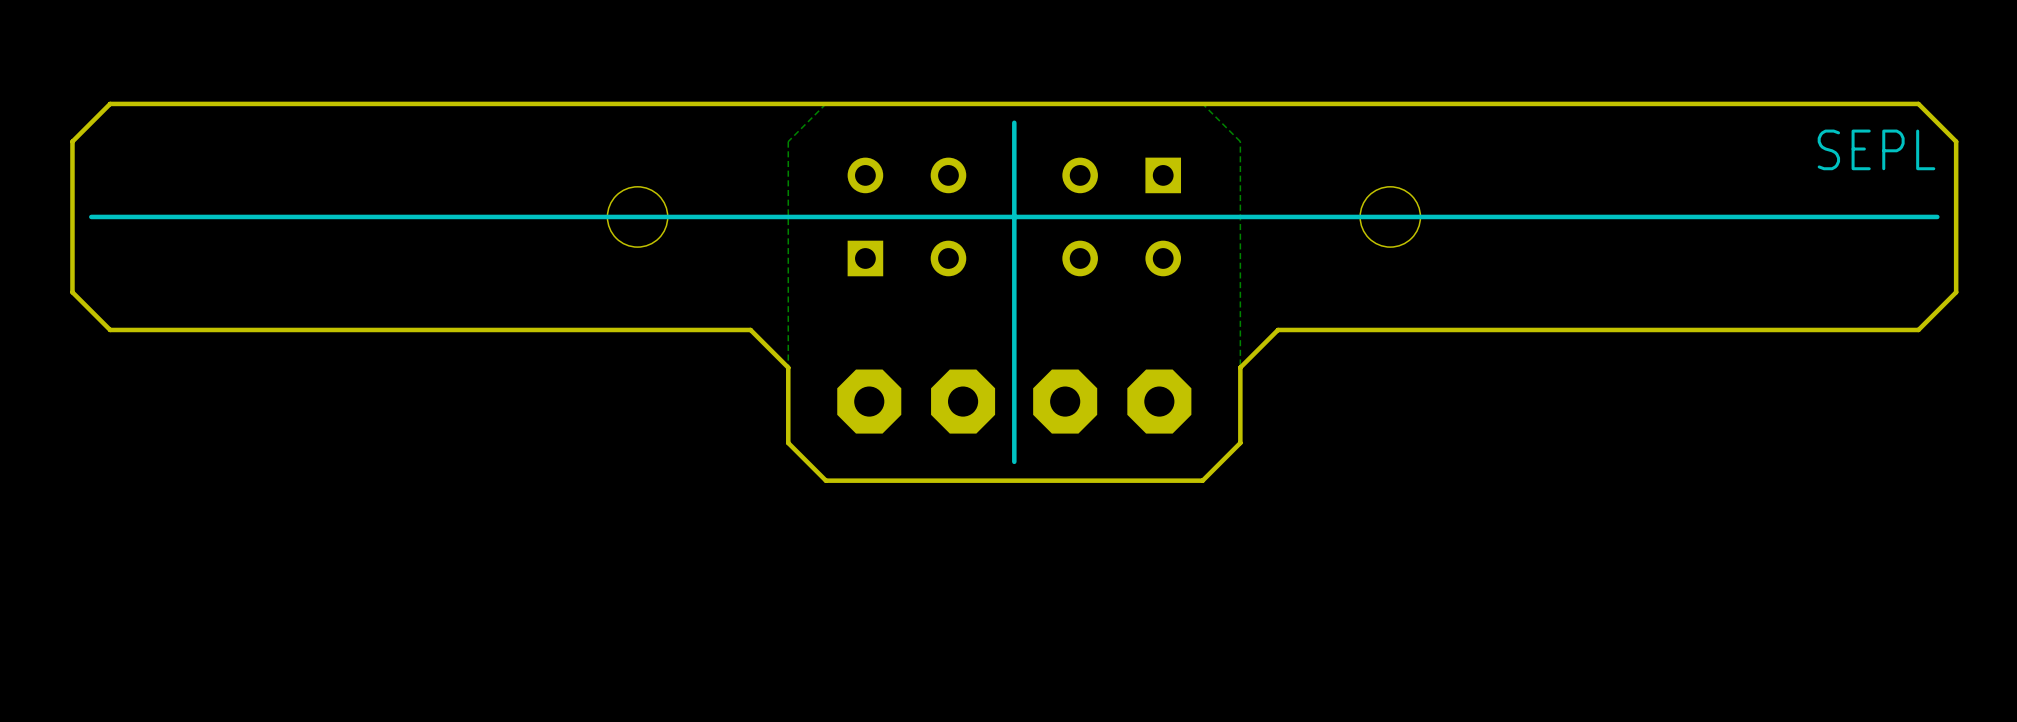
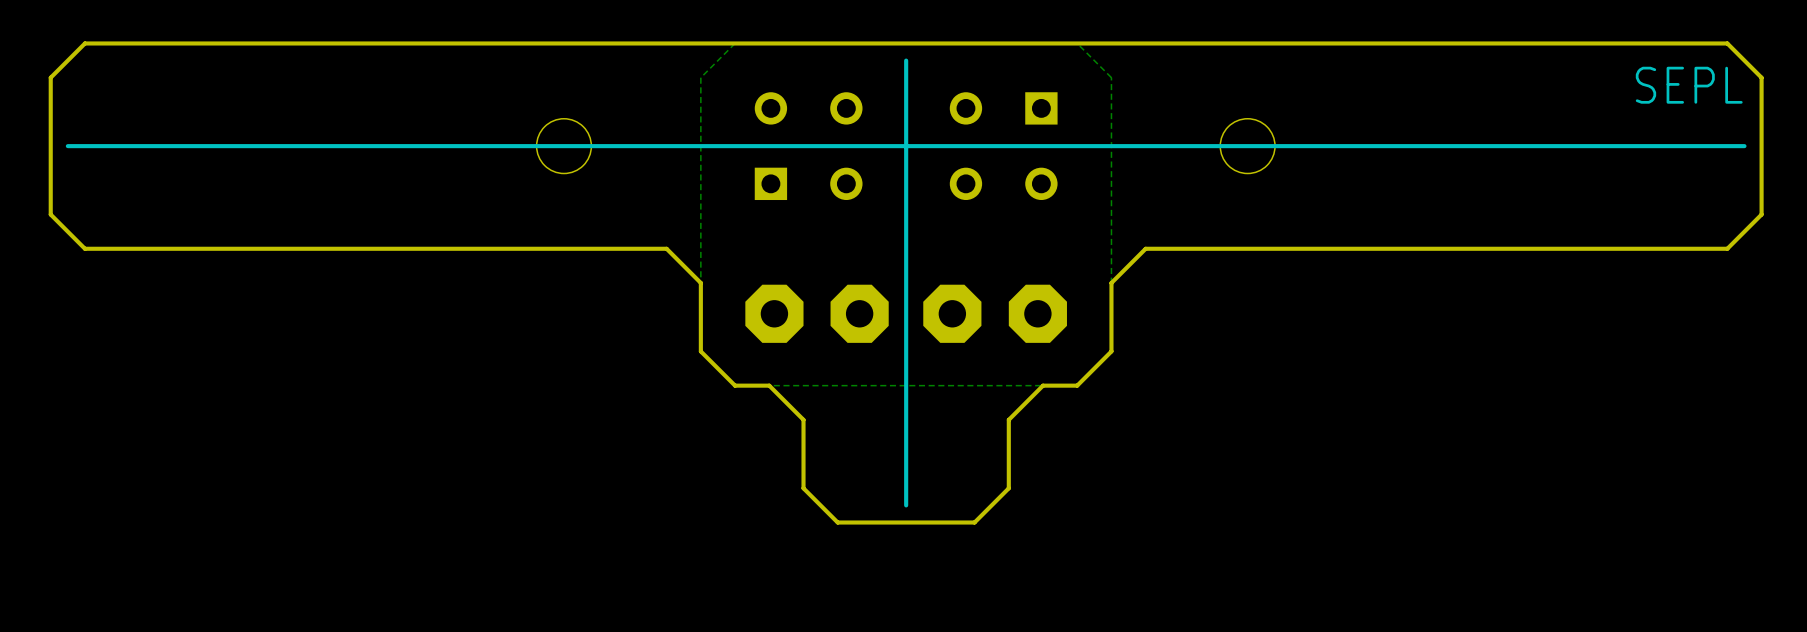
line: none -> (906, 368) (906, 505)
board edge: (1165, 480) (863, 480) -> (1043, 385) (1008, 419) (1008, 488) (974, 522) (837, 522) (803, 488) (803, 419) (769, 385)

